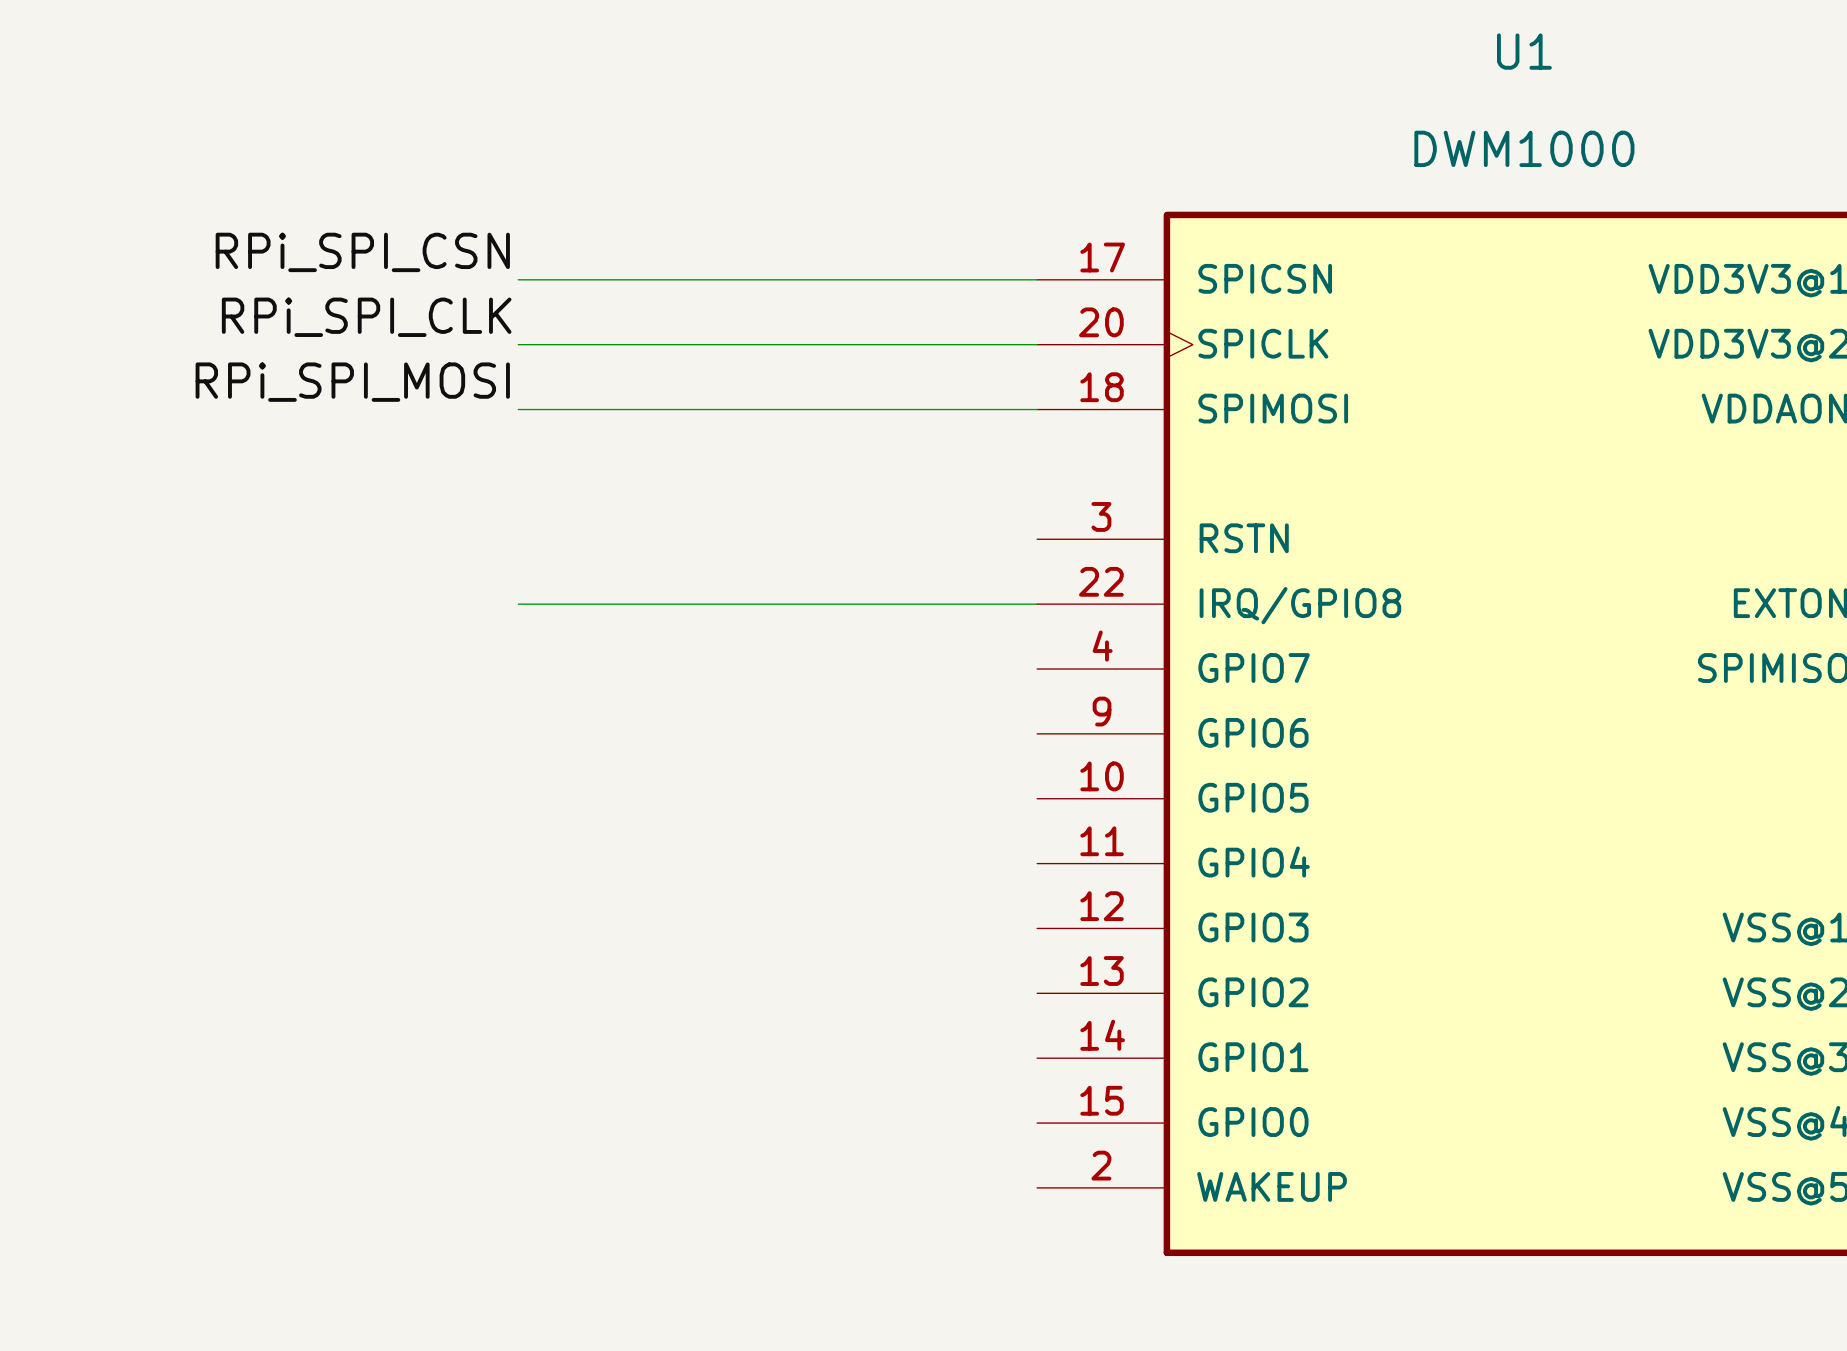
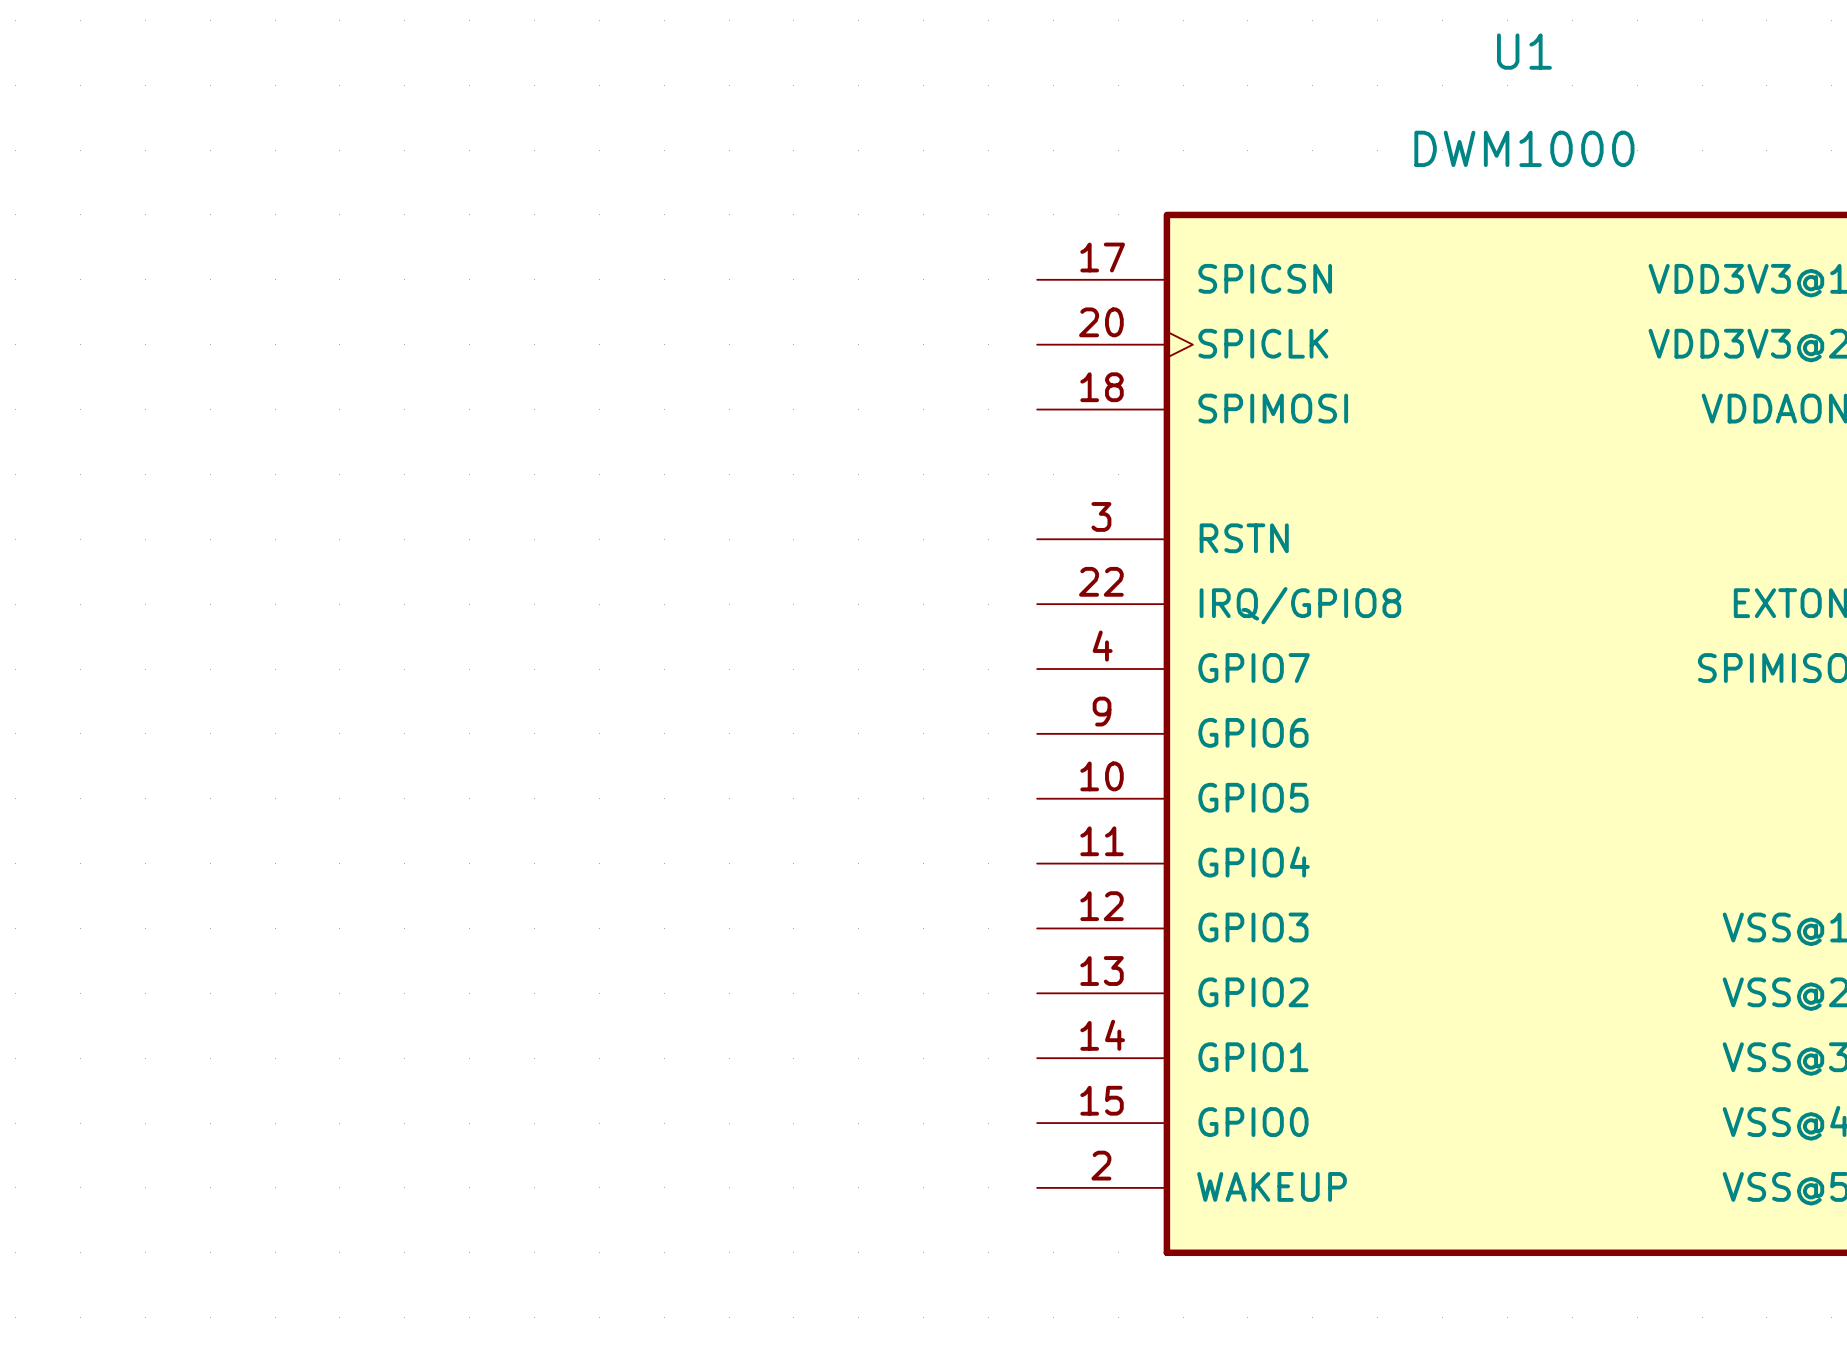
label: RPi_SPI_CSN (362, 252) -> none
wire: (518, 279) (1037, 279) -> none
label: RPi_SPI_CLK (366, 317) -> none
wire: (518, 344) (1037, 344) -> none
label: RPi_SPI_MOSI (352, 382) -> none
wire: (518, 409) (1037, 409) -> none
wire: (518, 604) (1037, 604) -> none

